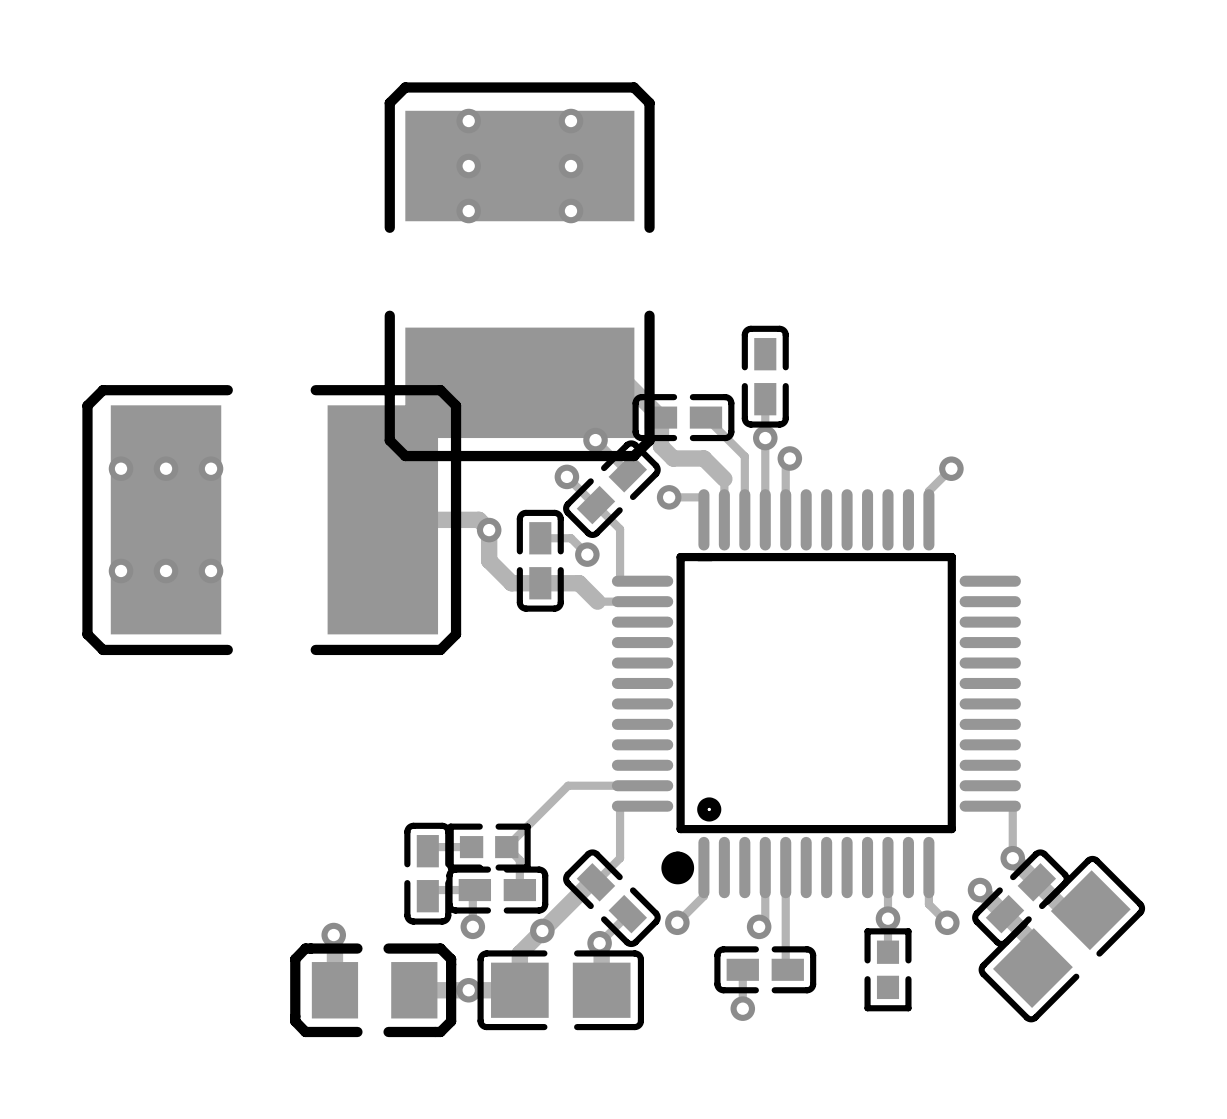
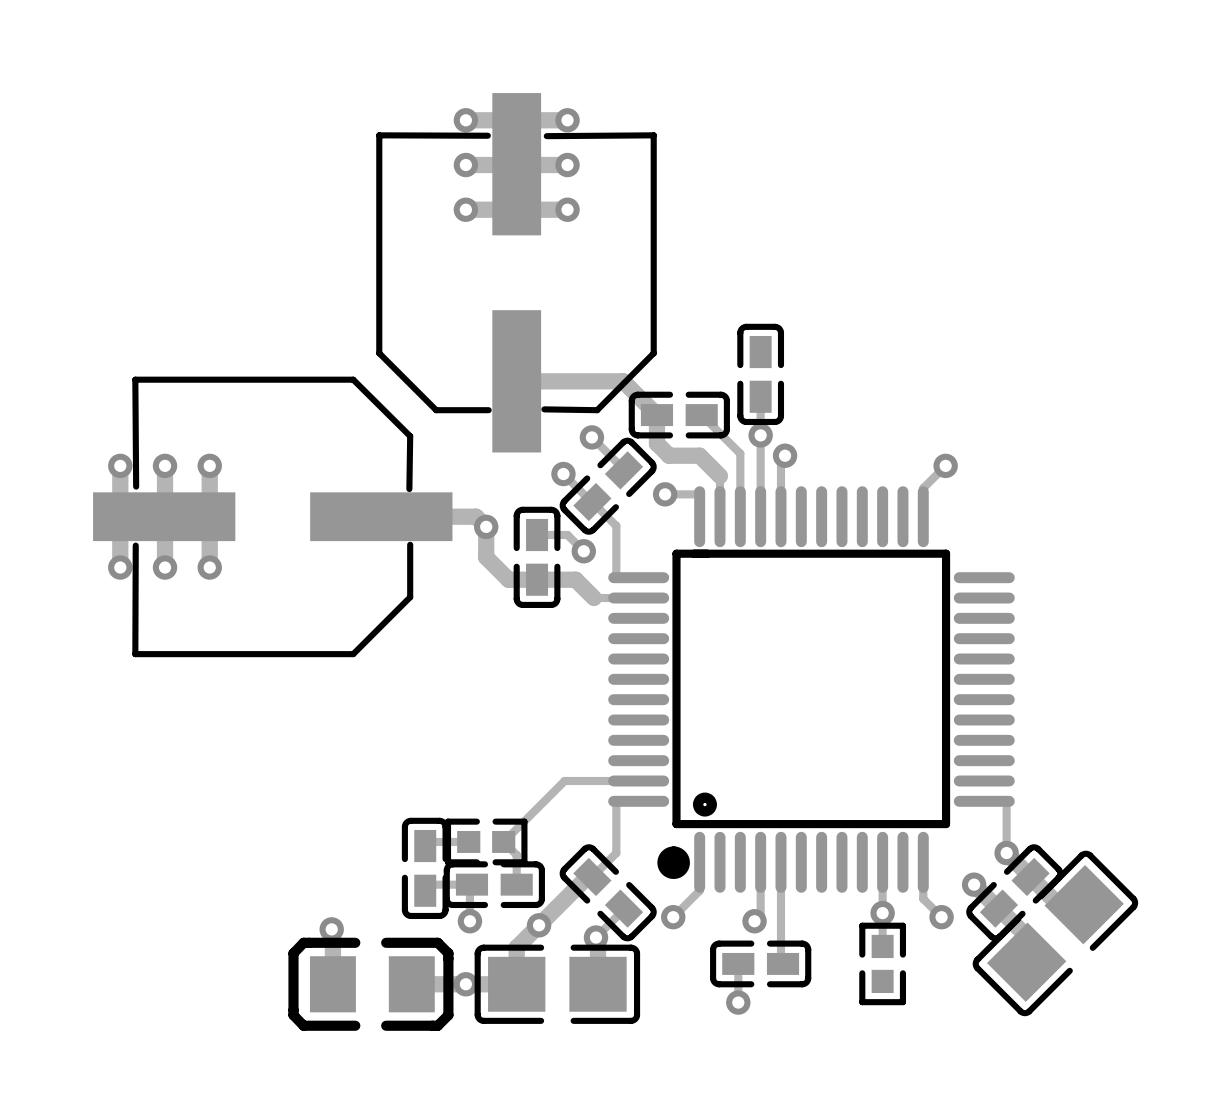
part footprint: [384, 82, 655, 462] -> [376, 93, 657, 453]
part footprint: [82, 385, 462, 656] -> [93, 376, 453, 658]

